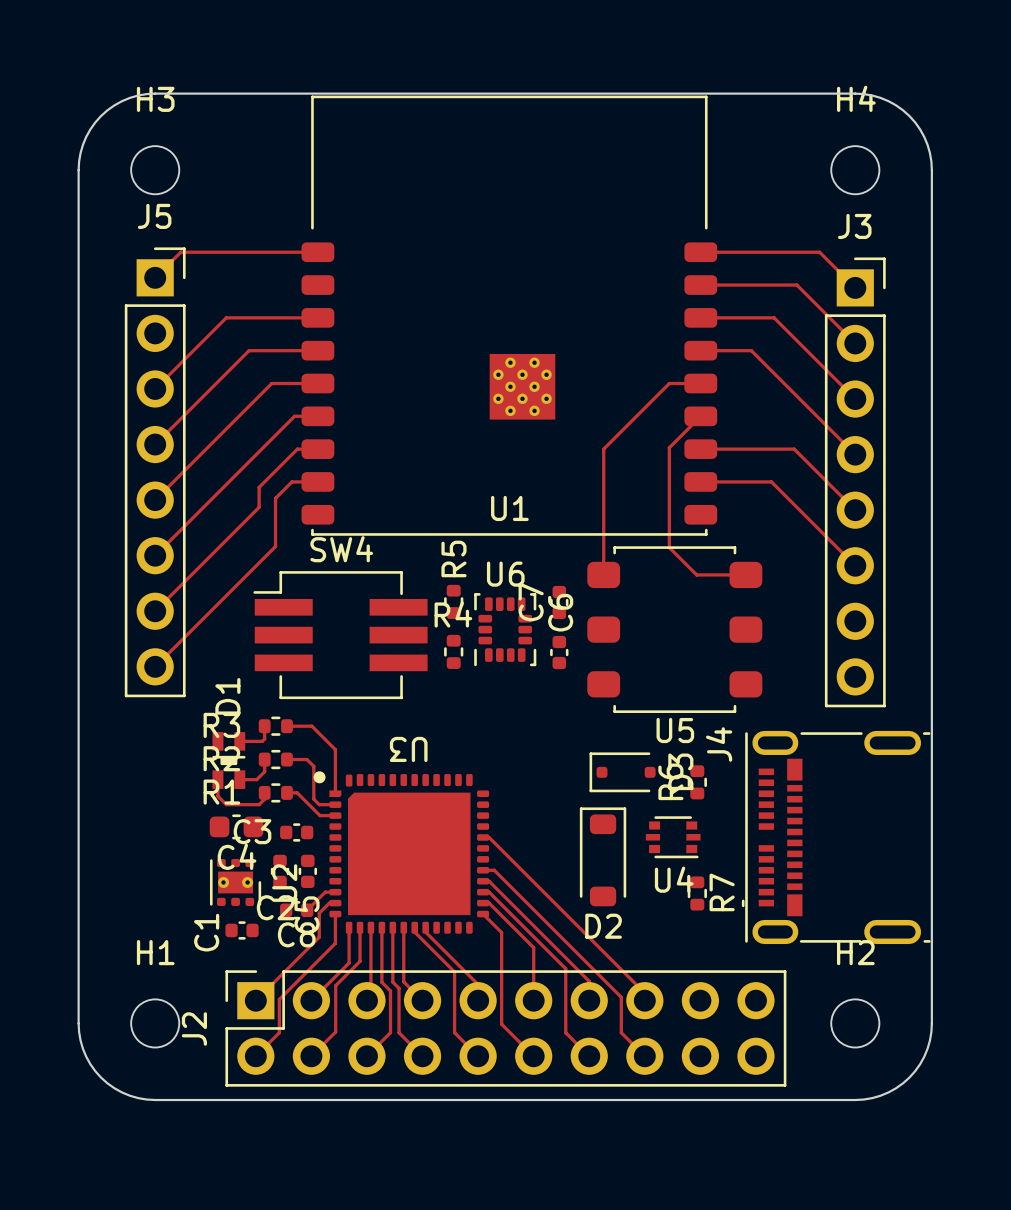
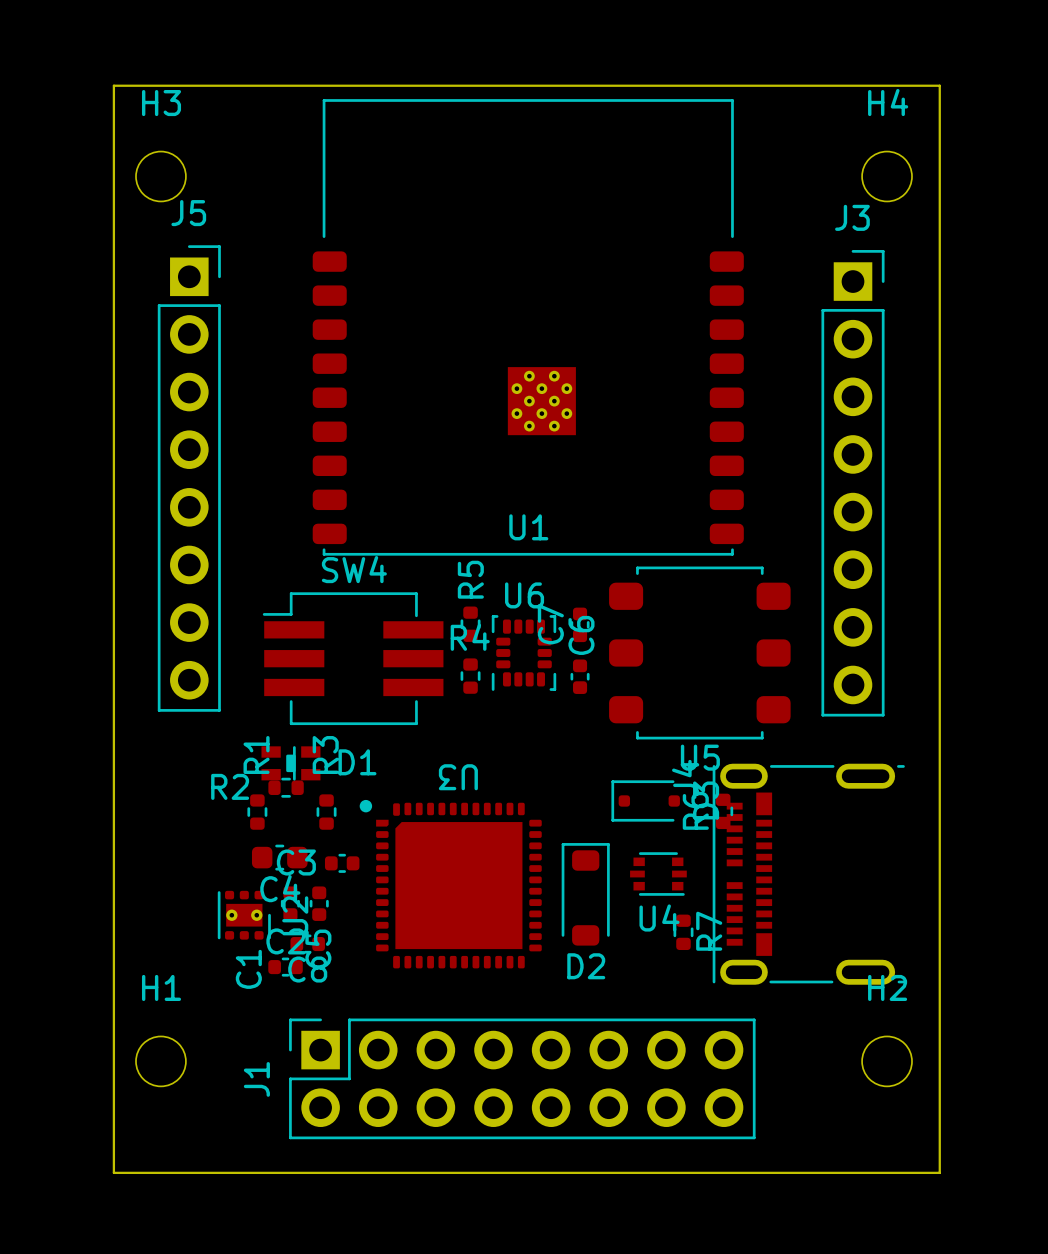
board edge: (155, 93) (855, 93) (872, 95) (888, 101) (903, 110) (915, 122) (927, 144) (931, 170) (931, 1023) (929, 1040) (924, 1056) (915, 1071) (903, 1083) (880, 1095) (855, 1100) (155, 1100) (138, 1098) (121, 1092) (107, 1083) (95, 1071) (82, 1048) (78, 1023) (79, 161) (86, 136) (101, 116) (121, 101) (138, 95) (155, 93) -> (113, 85) (113, 1172) (939, 1172) (939, 85) (113, 85)
track: (317, 252) (180, 252) (155, 277) -> none
track: (700, 252) (819, 252) (855, 287) -> none
track: (700, 285) (796, 285) (855, 343) -> none
track: (317, 317) (226, 317) (155, 388) -> none
track: (700, 317) (774, 317) (855, 399) -> none
track: (317, 350) (249, 350) (155, 444) -> none
track: (700, 350) (751, 350) (855, 454) -> none
track: (317, 383) (271, 383) (155, 500) -> none
track: (700, 383) (669, 383) (603, 449) (603, 574) -> none
track: (317, 416) (294, 416) (155, 555) -> none
track: (700, 416) (669, 447) (669, 547) (696, 574) (745, 574) -> none
track: (317, 449) (297, 449) (259, 487) (259, 507) (155, 611) -> none
track: (700, 449) (794, 449) (855, 510) -> none
J5 position: (155, 472) -> (189, 478)
track: (317, 481) (291, 481) (275, 498) (275, 546) (155, 666) -> none
track: (700, 481) (771, 481) (855, 565) -> none
J3 position: (855, 482) -> (853, 483)
track: (264, 726) (264, 738) (262, 741) (239, 741) -> none
R3 rotation: 0° (275, 726) -> 90° clockwise (326, 812)
R3 position: (275, 726) -> (326, 812)
track: (286, 726) (311, 726) (335, 749) (335, 793) -> none
track: (264, 759) (264, 771) (256, 779) (239, 779) -> none
track: (286, 759) (306, 759) (313, 766) (313, 799) (319, 804) (335, 804) -> none
D1 rotation: 0° (228, 760) -> 90° clockwise (290, 763)
D1 position: (228, 760) -> (290, 763)
track: (217, 779) (217, 796) (226, 804) (259, 804) (264, 799) (264, 792) -> none
R1 rotation: 0° (275, 792) -> 90° clockwise (257, 812)
R1 position: (275, 792) -> (257, 812)
track: (286, 792) (297, 792) (319, 815) (335, 815) -> none
C4 position: (236, 826) -> (279, 857)
C3 position: (296, 832) -> (342, 863)
track: (483, 837) (489, 837) (644, 993) (644, 1000) -> none
U4 position: (673, 837) -> (658, 874)
J4 position: (836, 837) -> (807, 874)
U3 position: (401, 852) -> (450, 884)
D2 position: (603, 856) -> (585, 894)
track: (483, 870) (494, 870) (621, 997) (621, 1032) (644, 1056) -> none
track: (483, 881) (489, 881) (589, 981) (589, 1000) -> none
track: (335, 892) (325, 892) (307, 910) -> none
track: (483, 892) (489, 892) (565, 968) (565, 1032) (589, 1056) -> none
R7 position: (697, 893) -> (683, 932)
track: (335, 903) (329, 903) (319, 913) (319, 937) (255, 1000) -> none
track: (483, 903) (489, 903) (533, 947) (533, 1000) -> none
track: (335, 914) (335, 943) (279, 999) (279, 1032) (255, 1056) -> none
track: (483, 914) (501, 932) (501, 1024) (533, 1056) -> none
track: (349, 927) (349, 963) (311, 1000) -> none
track: (360, 927) (360, 961) (335, 985) (335, 1031) (311, 1056) -> none
track: (370, 927) (370, 996) (366, 1000) -> none
track: (381, 927) (381, 982) (390, 990) (390, 1032) (366, 1056) -> none
track: (392, 927) (392, 982) (399, 988) (399, 1032) (422, 1056) -> none
track: (403, 927) (403, 981) (422, 1000) -> none
track: (414, 927) (414, 932) (454, 972) (454, 1032) (478, 1056) -> none
track: (425, 927) (425, 932) (478, 984) (478, 1000) -> none
C1 position: (242, 930) -> (285, 967)
J2: (505, 1028) -> none
J1: none -> (522, 1078)

